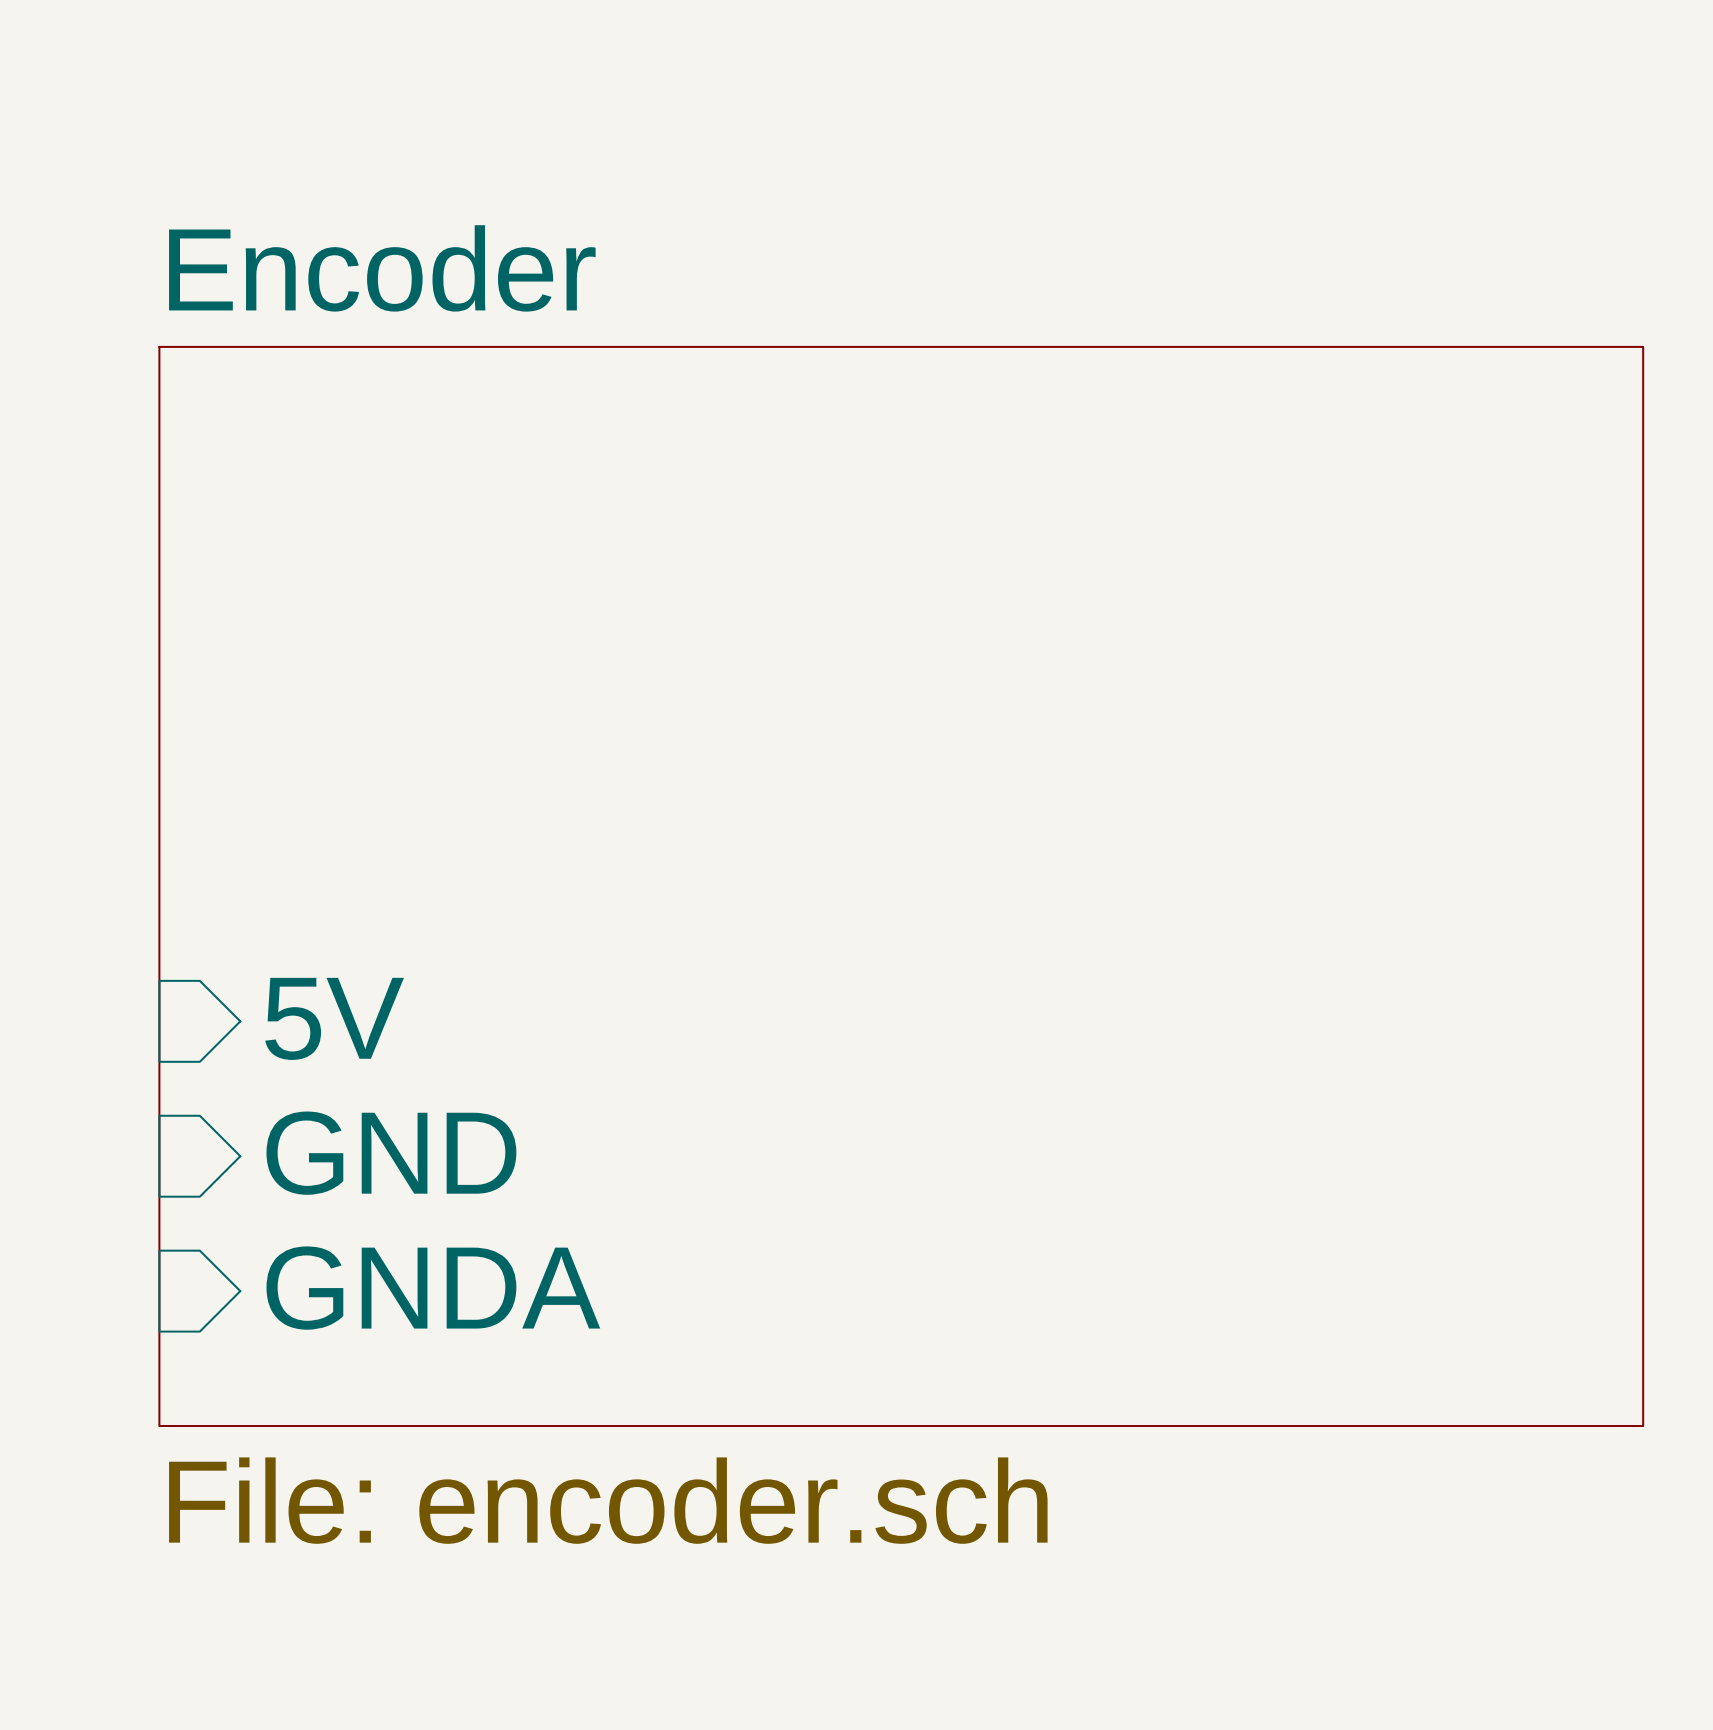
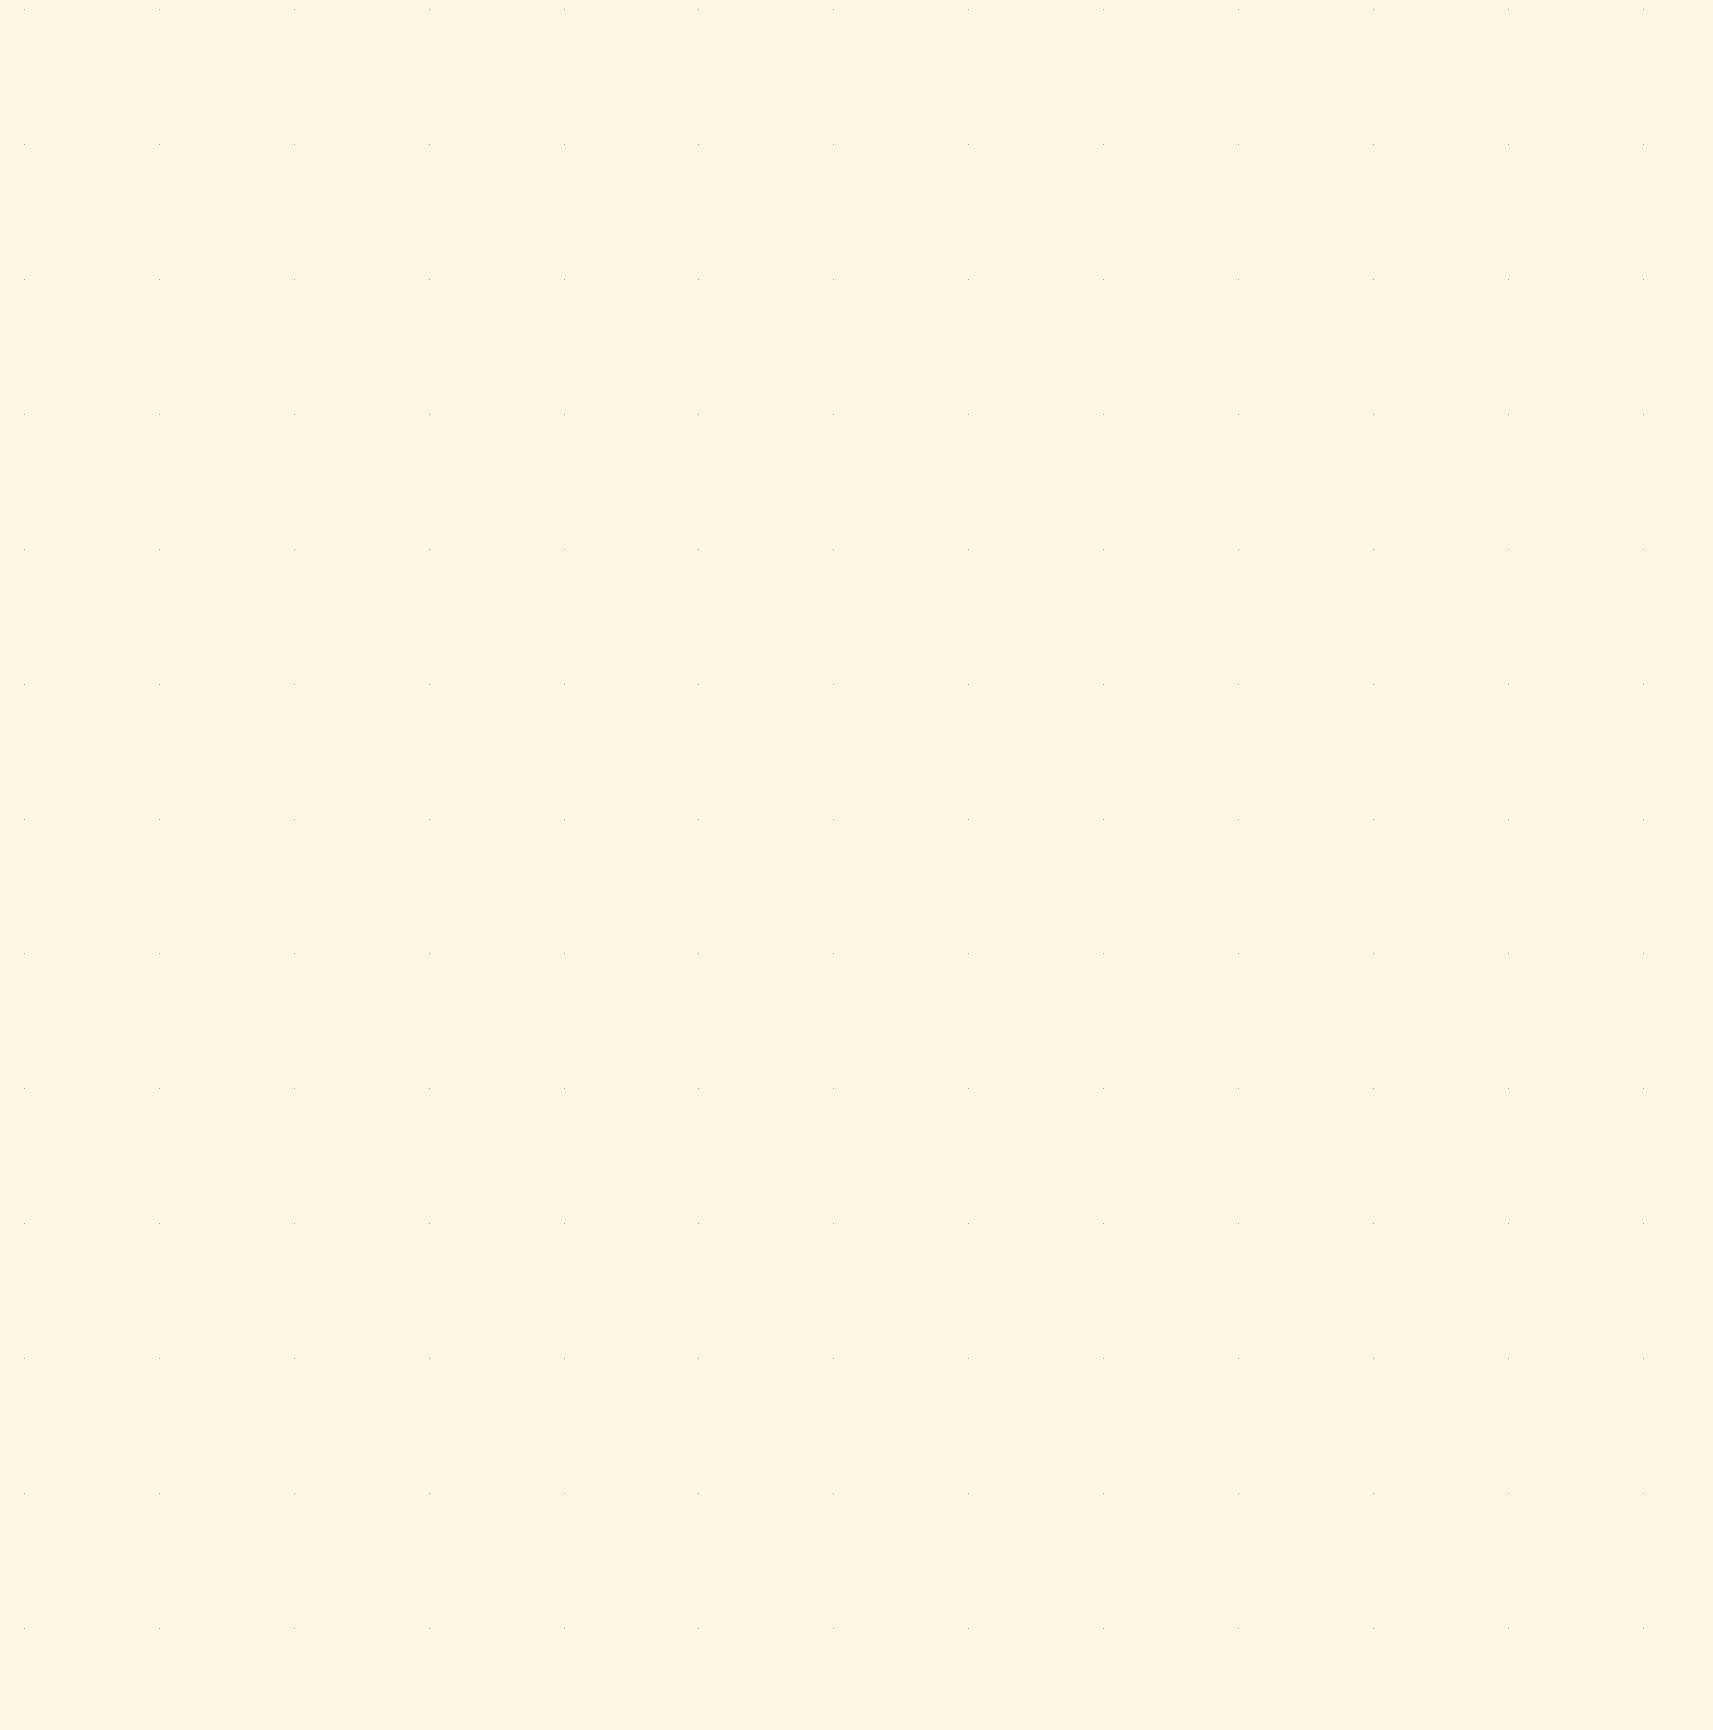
sheet Encoder: File: encoder.sch (901, 886) -> none
sheet pin: 5V (334, 1018) -> none
sheet pin: GND (391, 1153) -> none
sheet pin: GNDA (433, 1288) -> none

